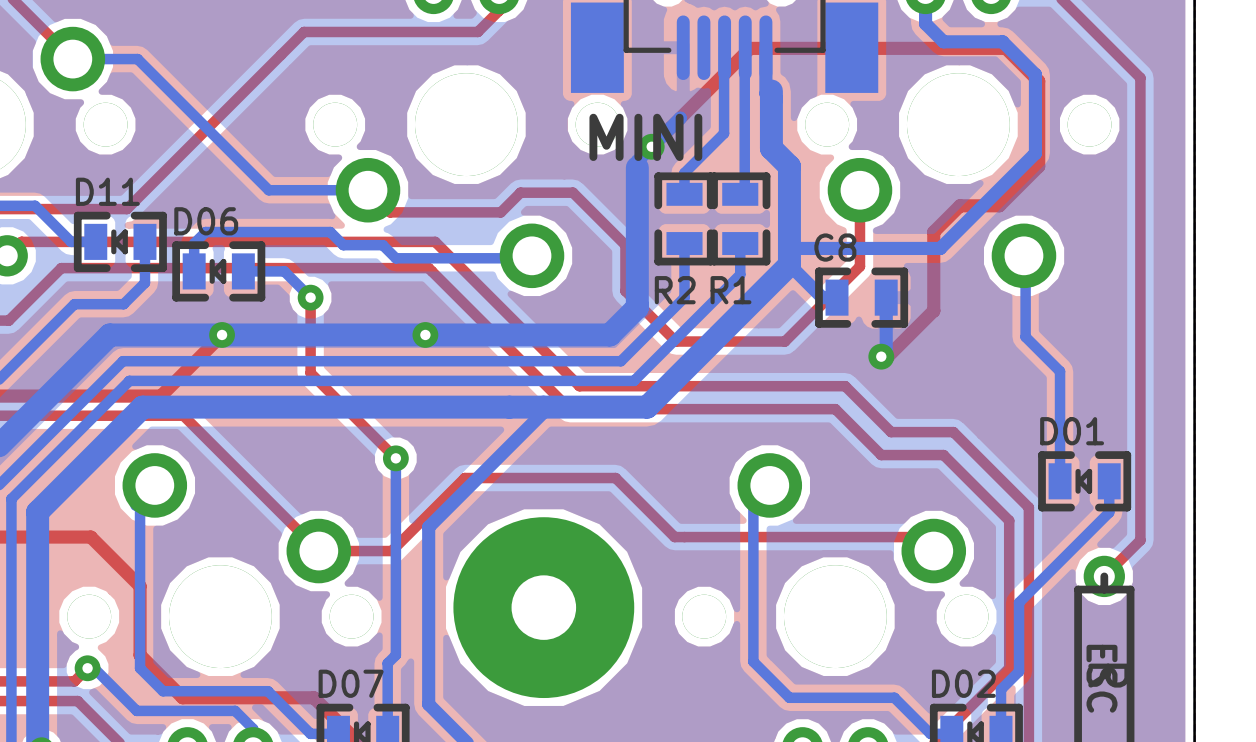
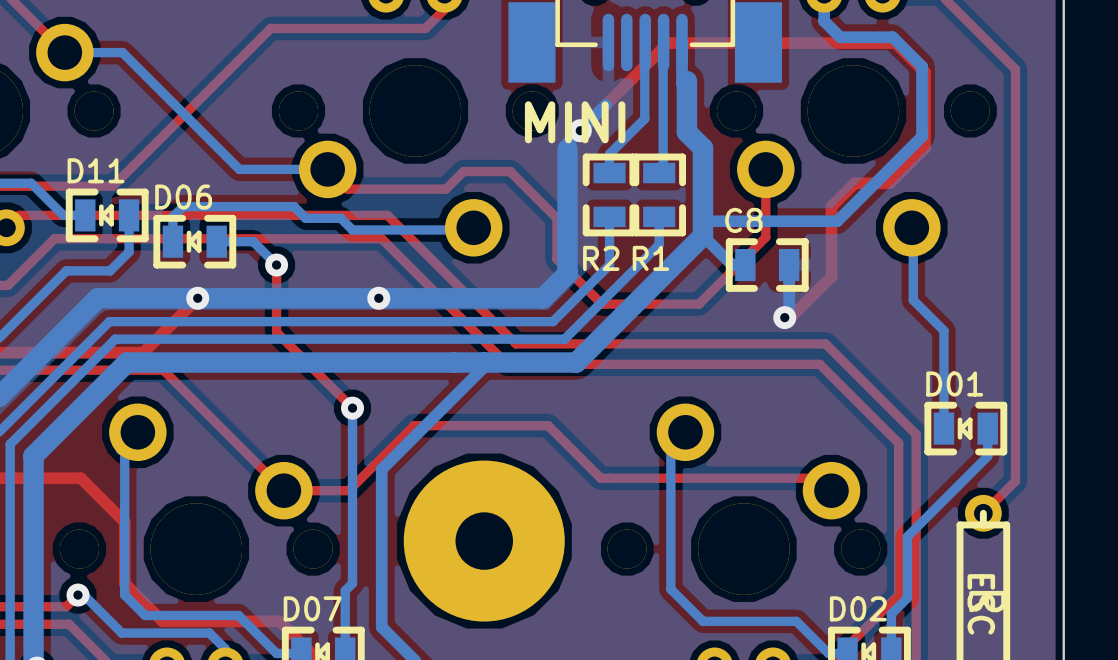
top track: (845, 386) (891, 432) (953, 432) (1028, 507) -> (752, 343) (825, 343) (916, 434) (916, 451)
top track: (835, 409) (881, 455) (943, 455) (1009, 520) -> (743, 364) (819, 364) (898, 443) (898, 463)

